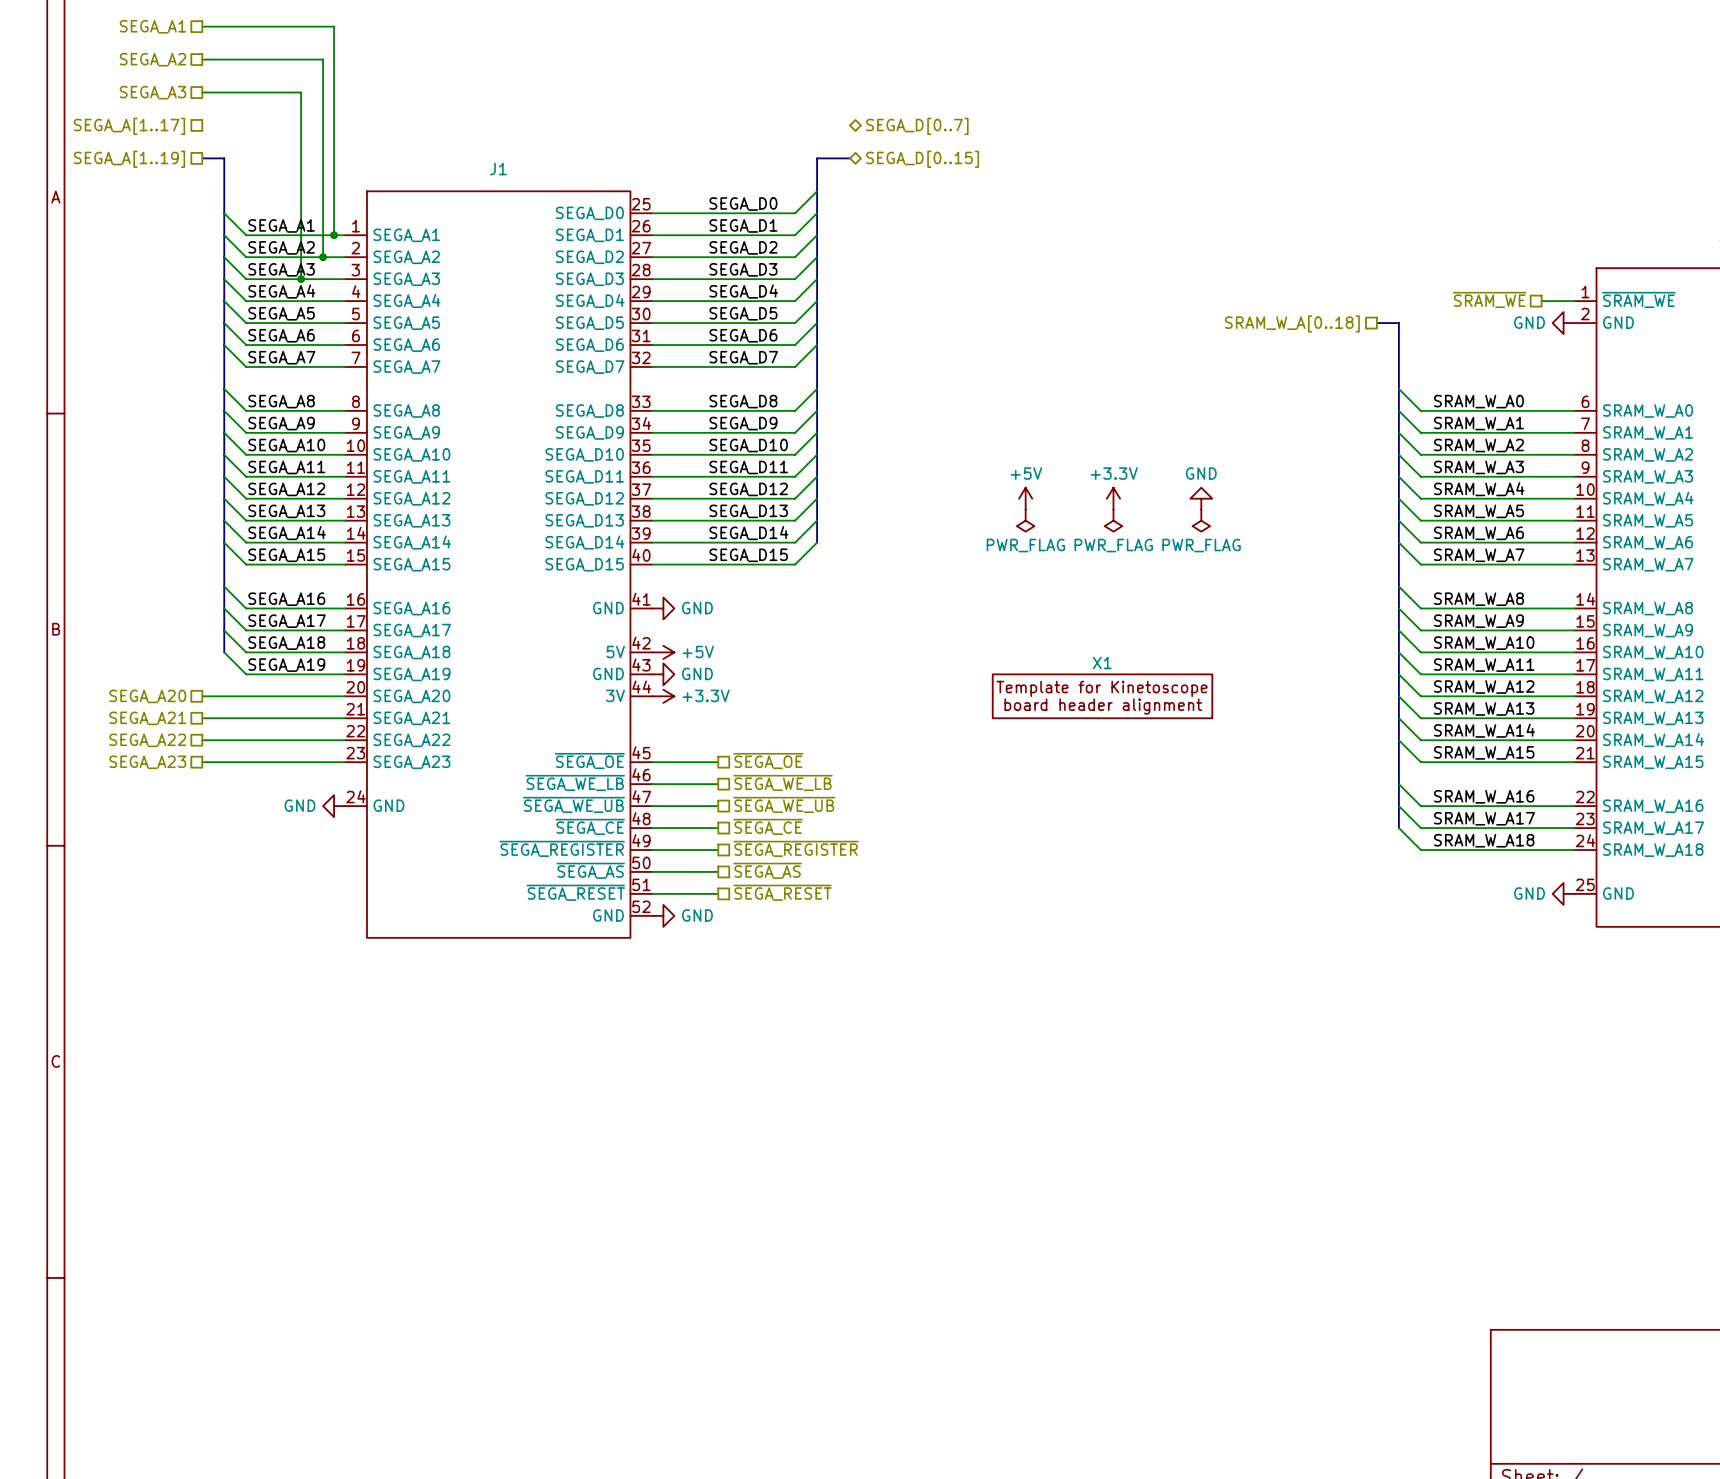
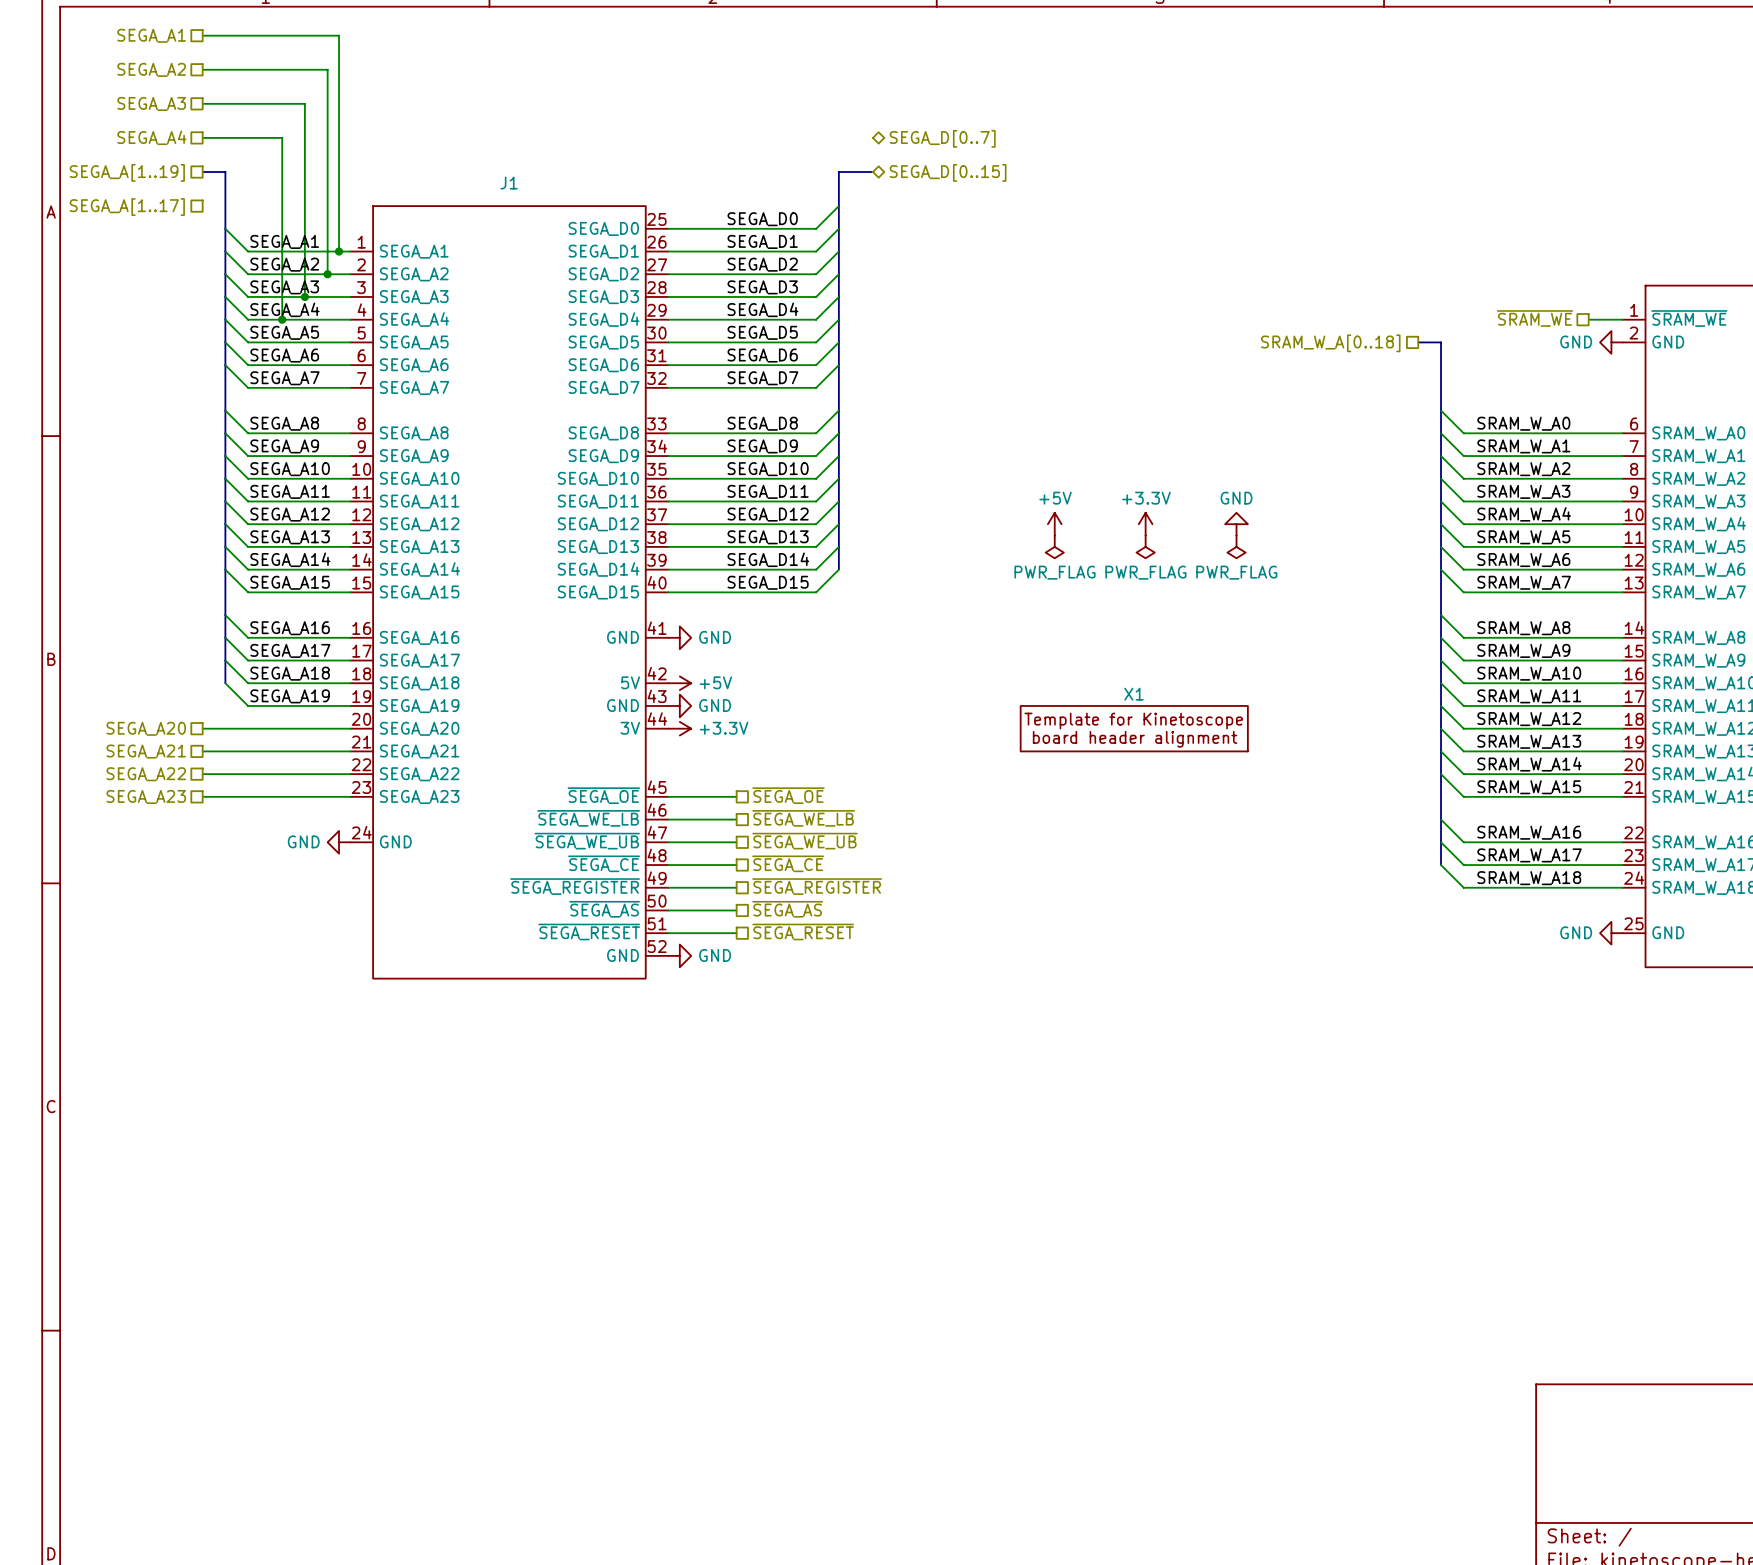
wire: none -> (202, 137) (282, 137) (282, 319)
hierarchical label: SEGA_A[1..17] (129, 126) -> SEGA_A4 (151, 137)
hierarchical label: none -> SEGA_A[1..17] (127, 207)
junction: none -> (282, 319)

